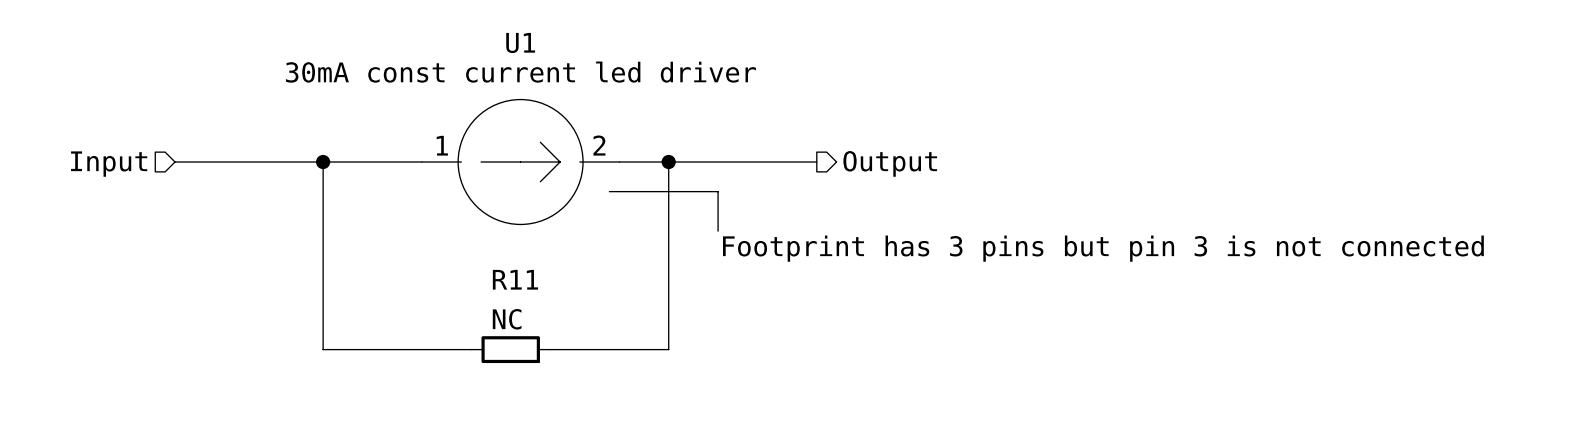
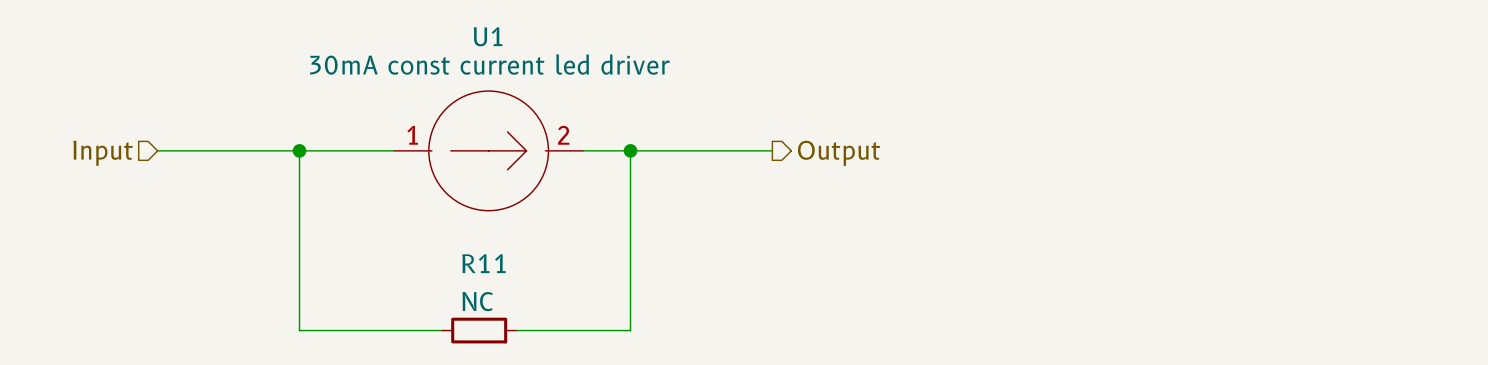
line: (609, 191) (718, 191) (718, 231) -> none
text: Footprint has 3 pins but pin 3 is not connected (1103, 248) -> none

